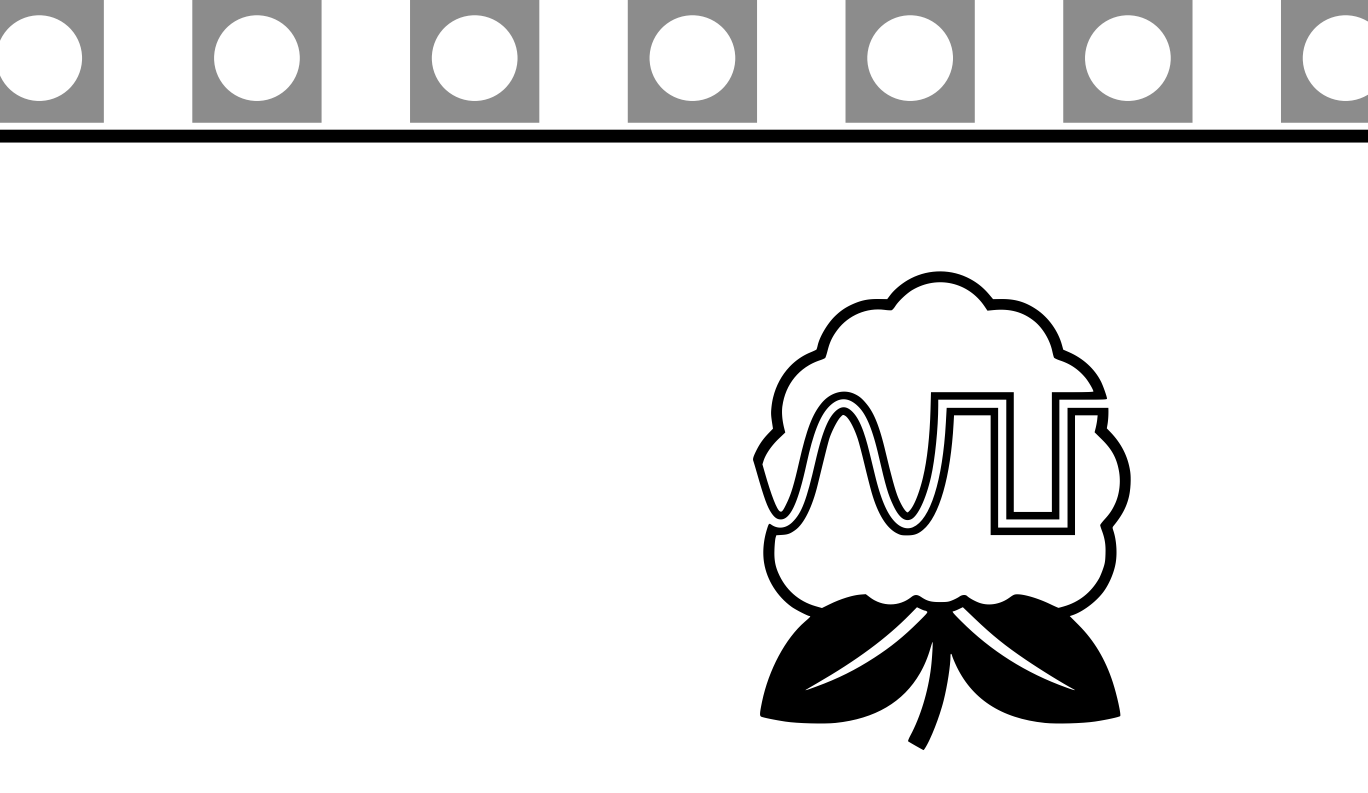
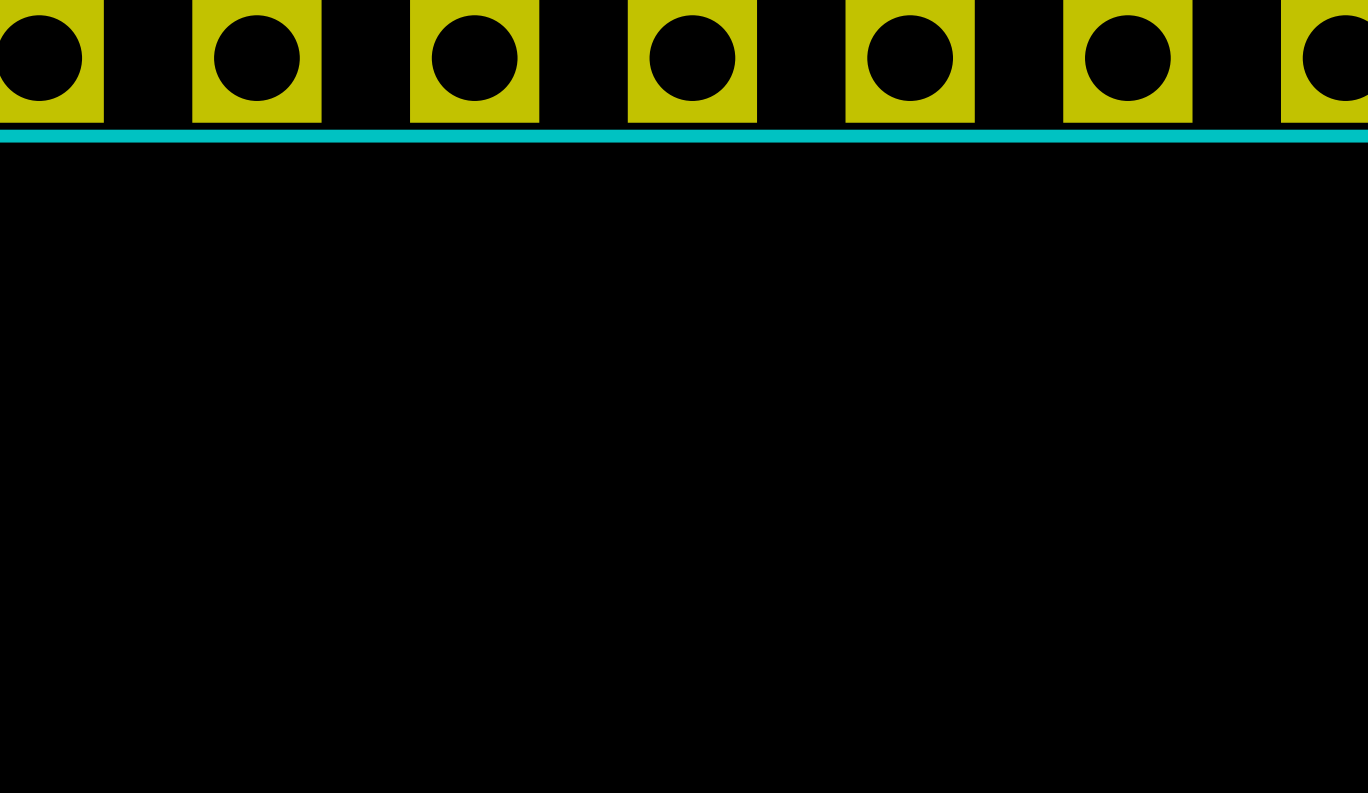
drawing: [753, 271, 1131, 751] -> none

